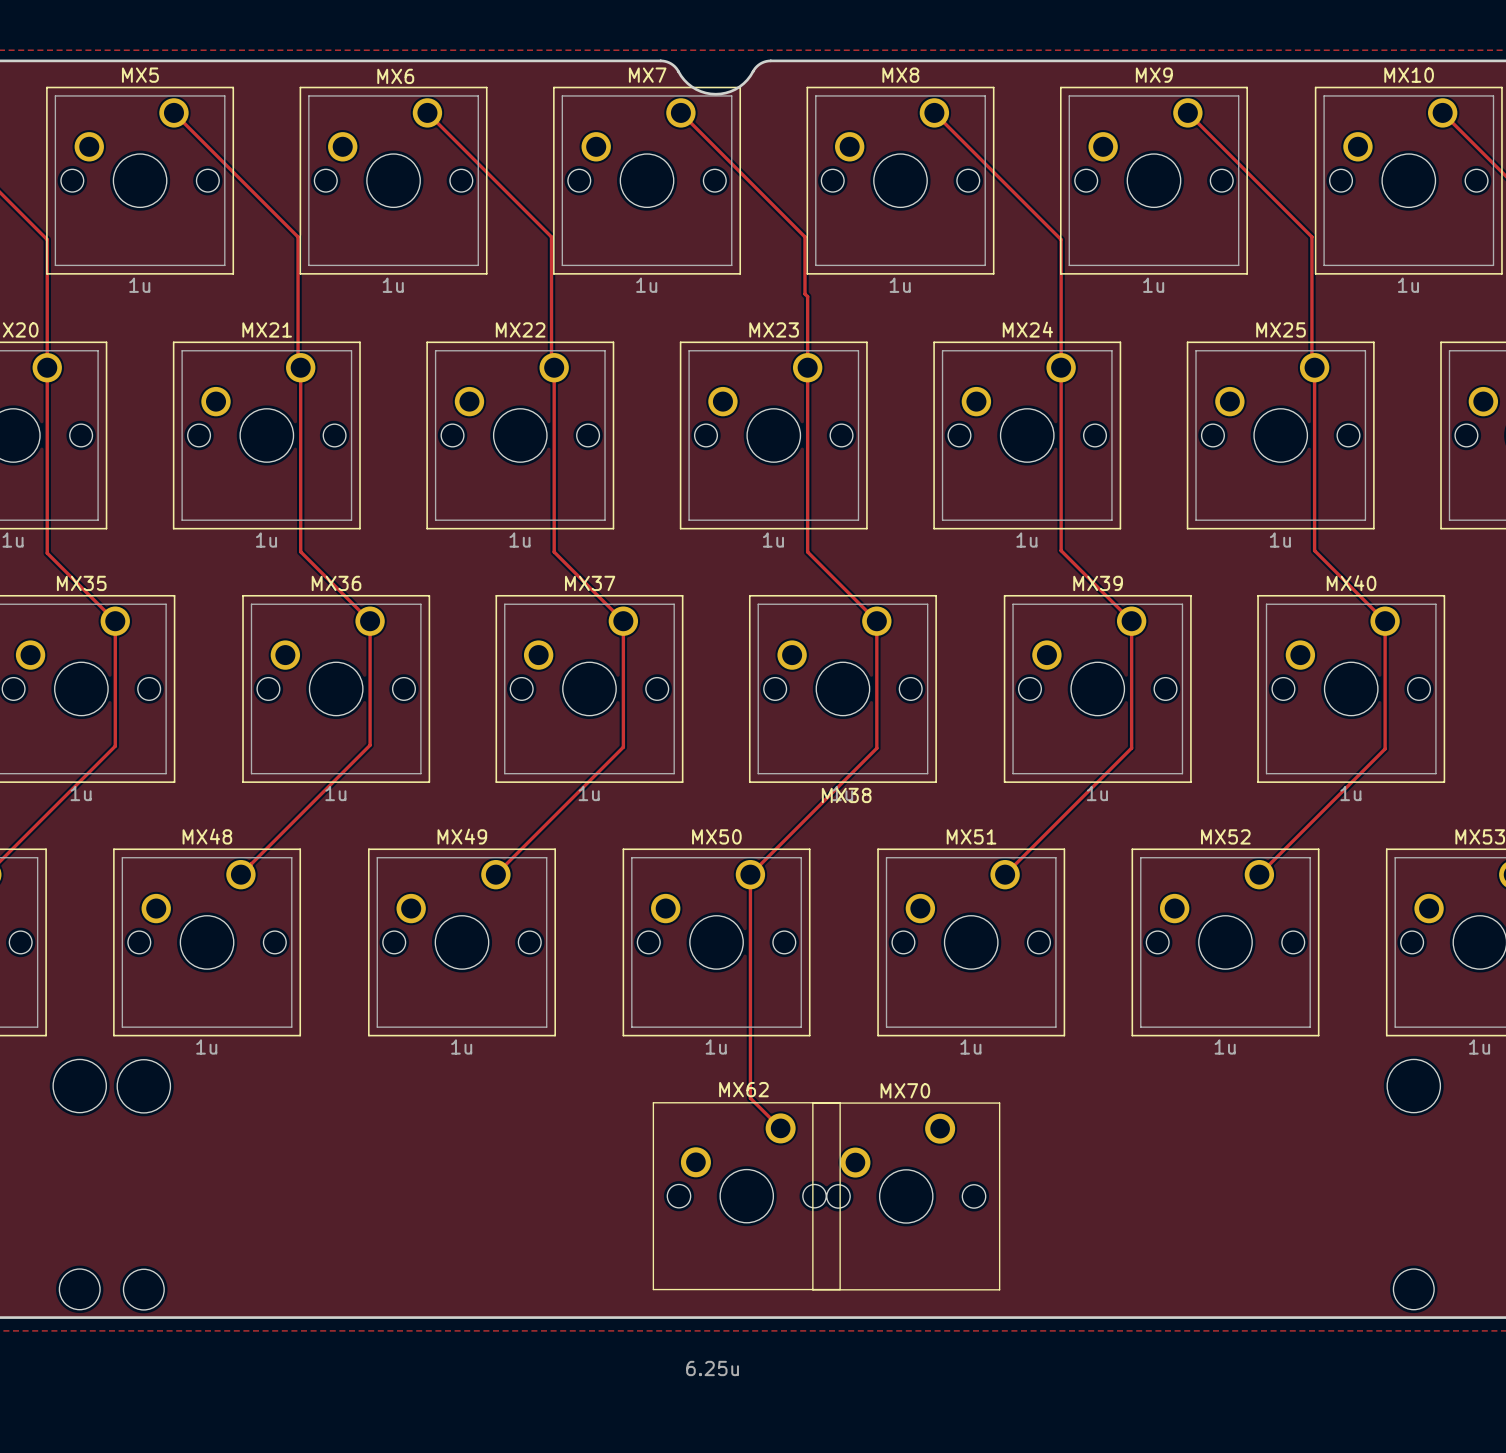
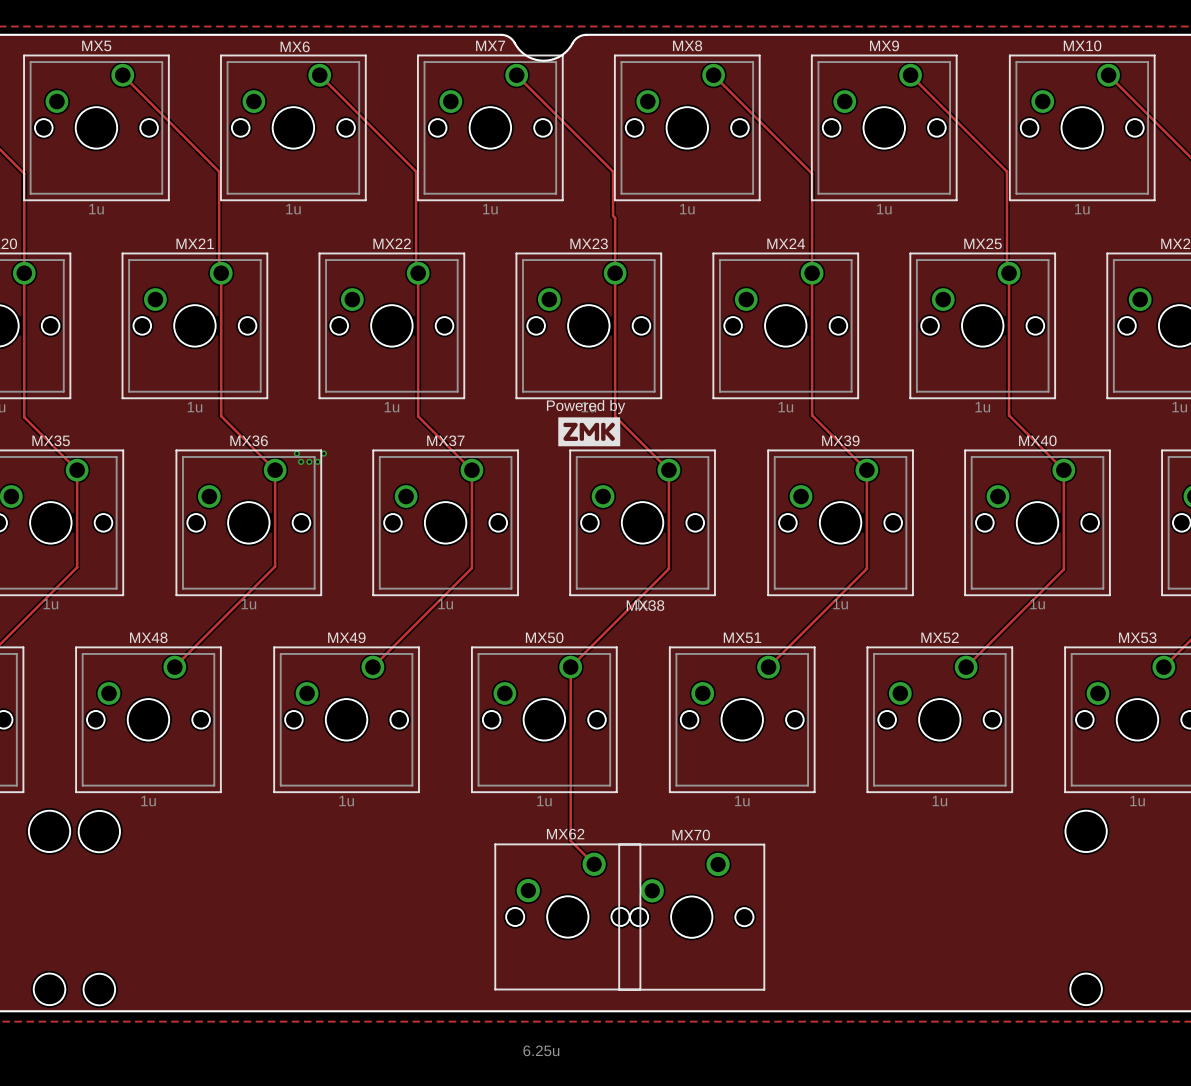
text: none -> Powered by (586, 406)
drawing: none -> [558, 417, 621, 447]
via: none -> (296, 453)
via: none -> (323, 453)
via: none -> (301, 461)
via: none -> (309, 461)
via: none -> (317, 461)

